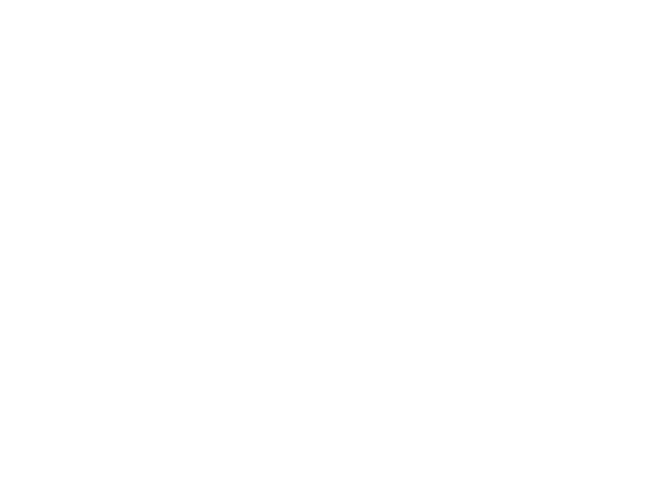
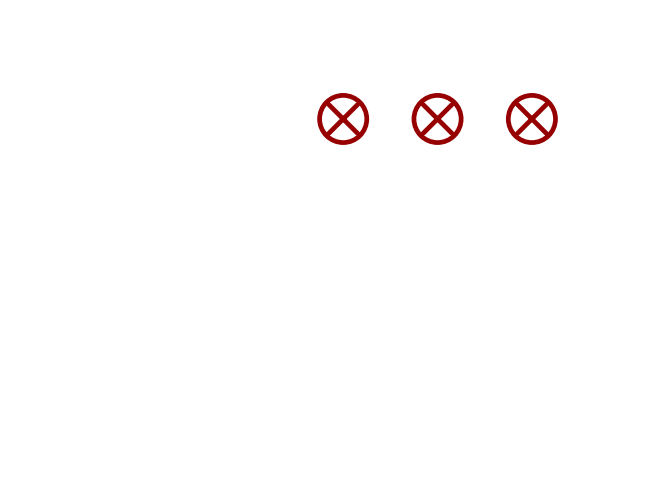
part: none -> (343, 118)
part: none -> (437, 118)
part: none -> (531, 118)

